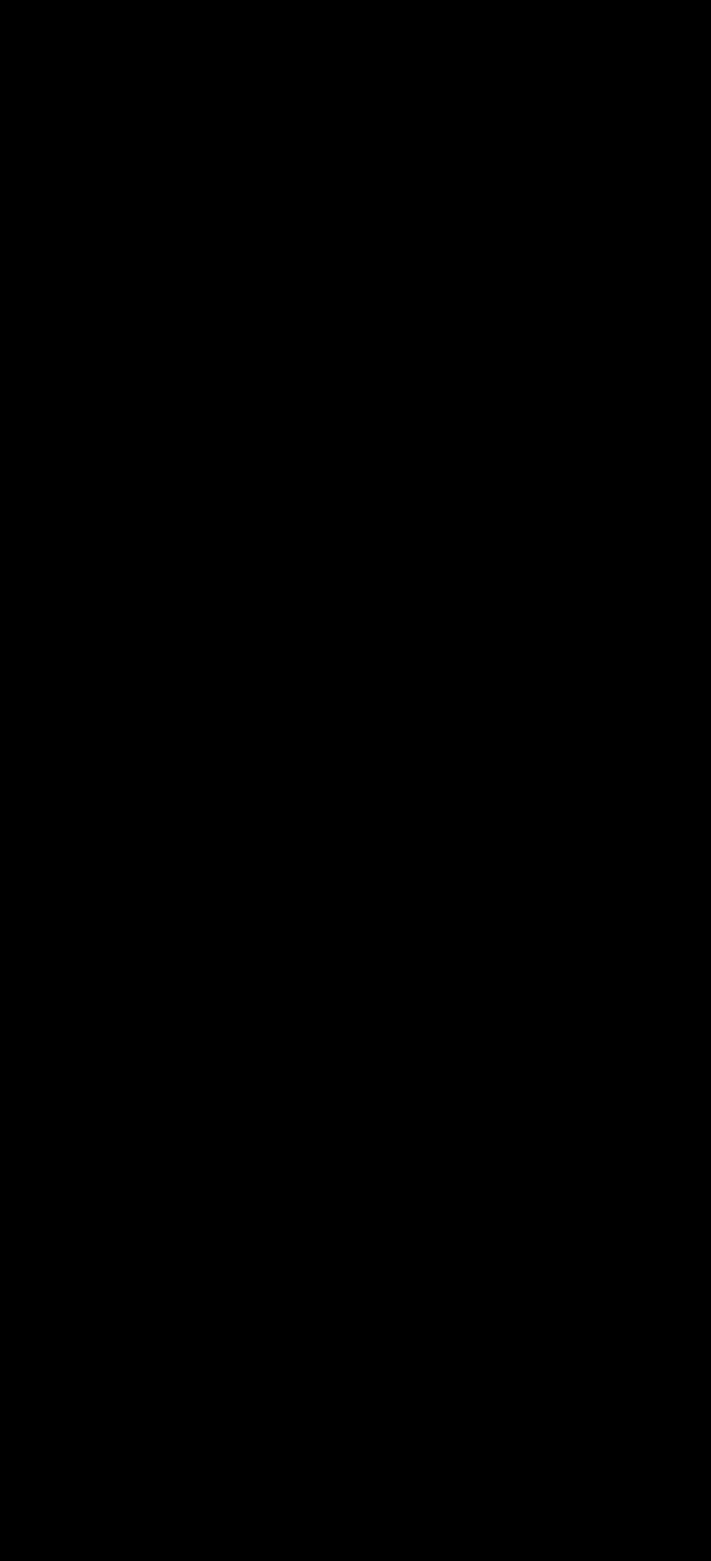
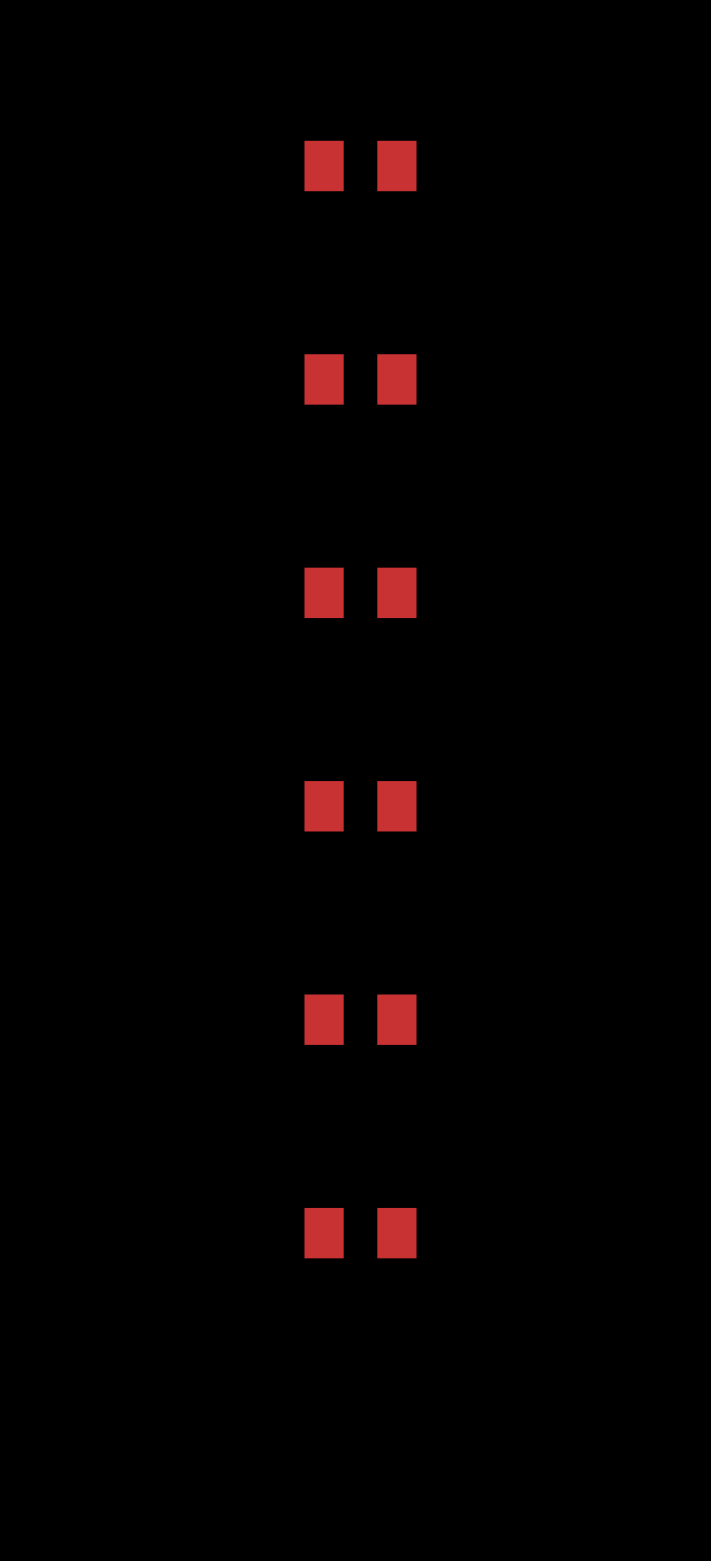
part: none -> (360, 166)
part: none -> (360, 379)
part: none -> (360, 592)
part: none -> (360, 806)
part: none -> (360, 1019)
part: none -> (360, 1233)

